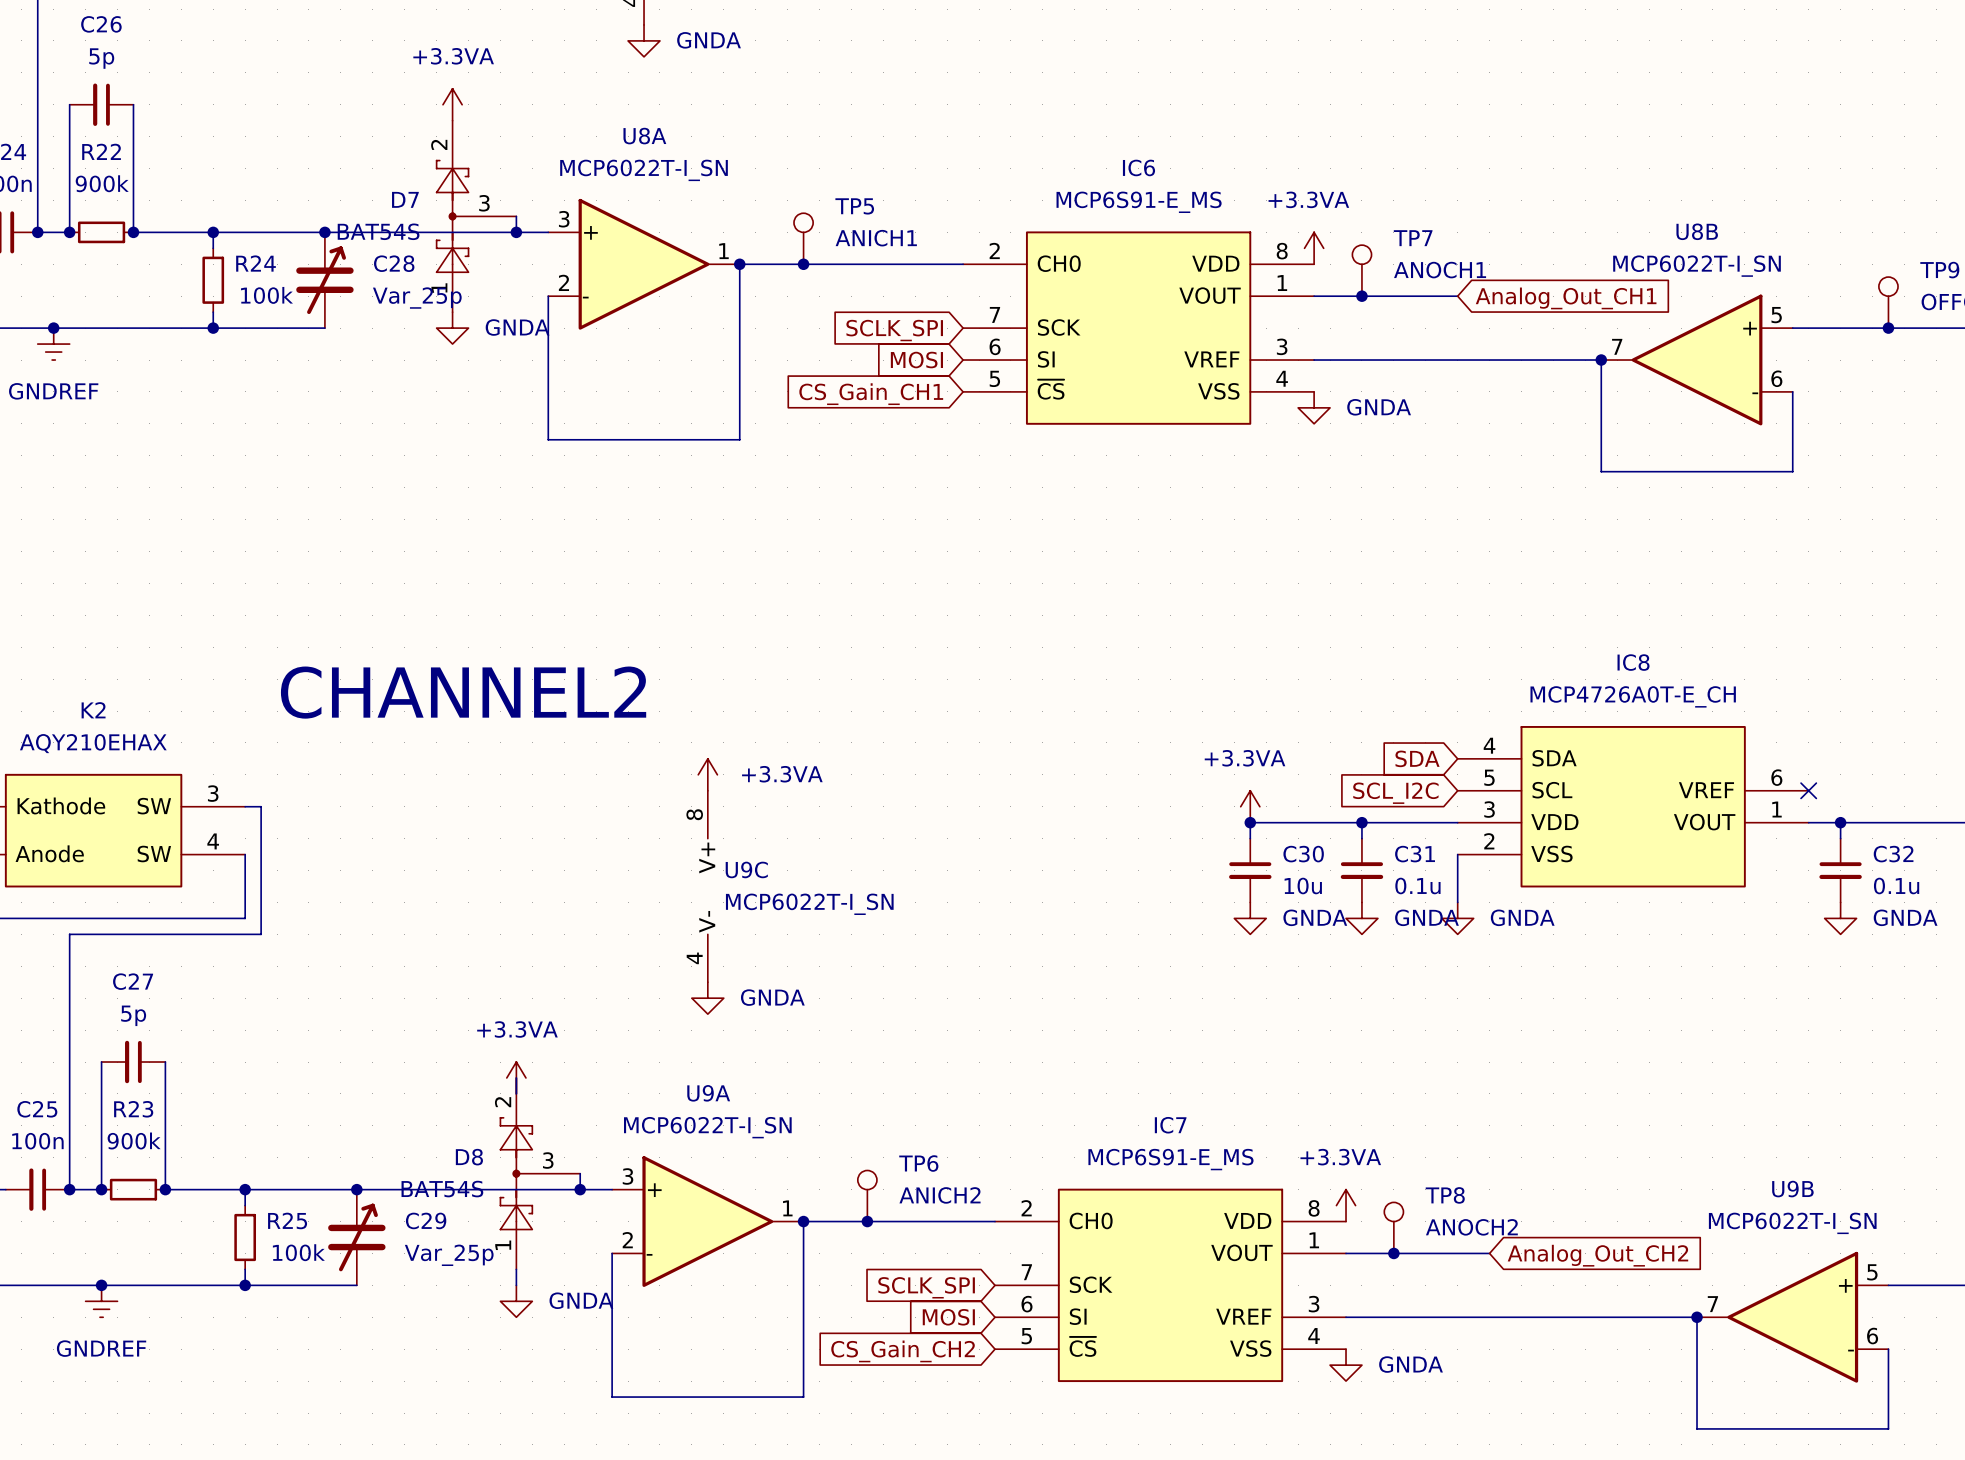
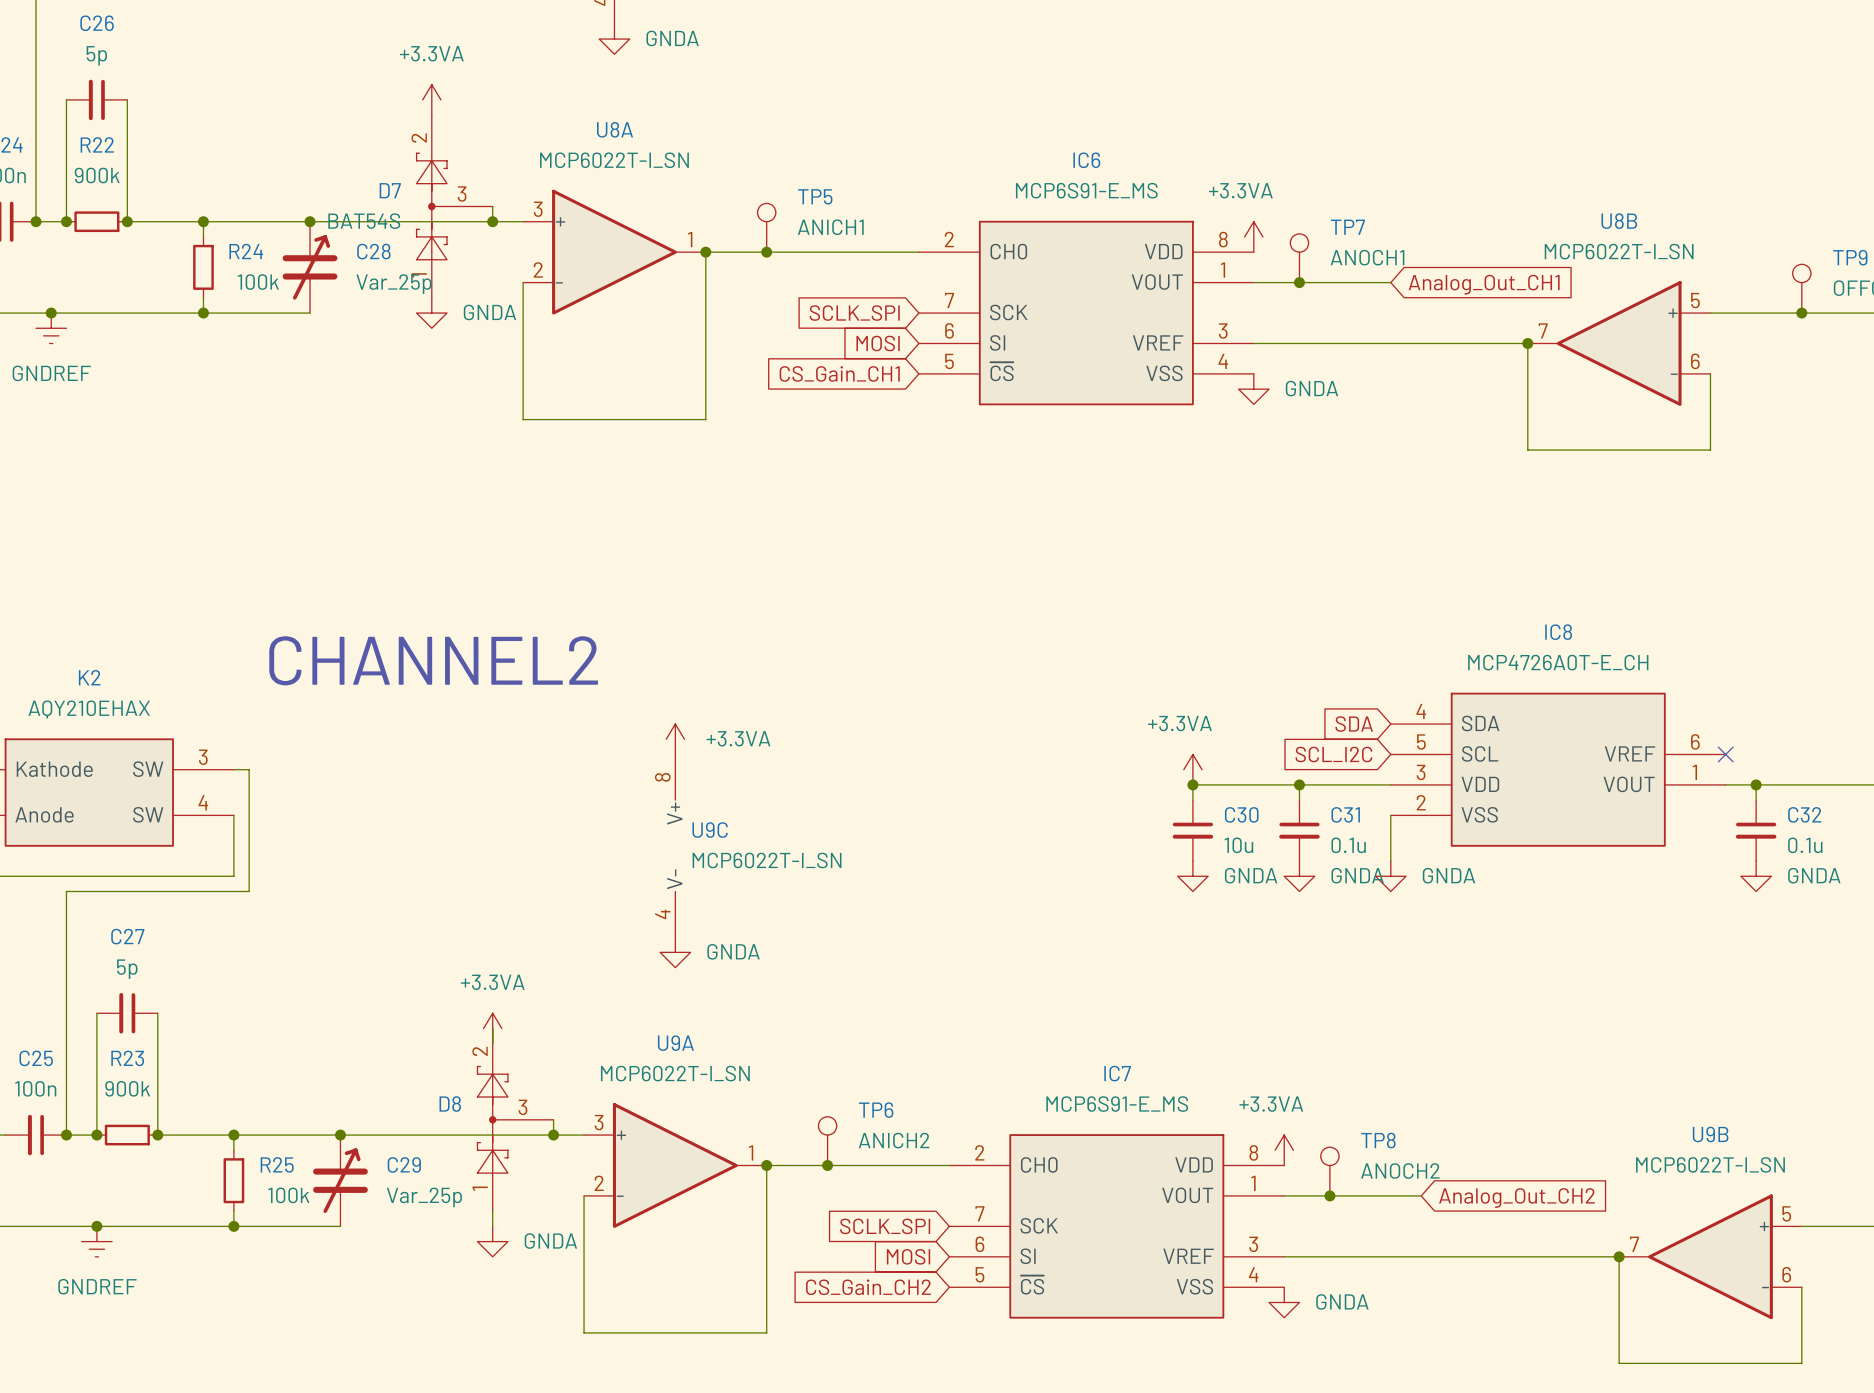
D8 value: BAT54S (442, 1189) -> none

